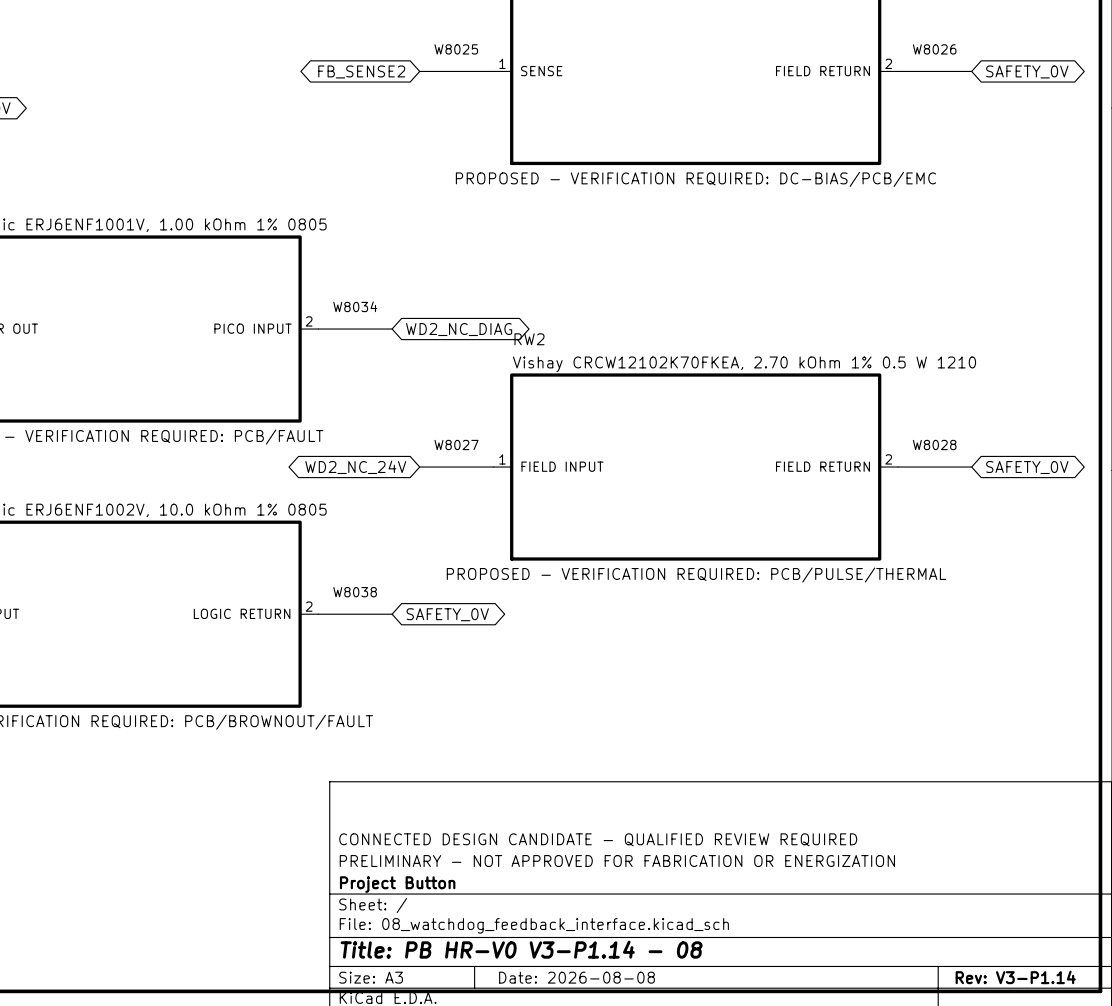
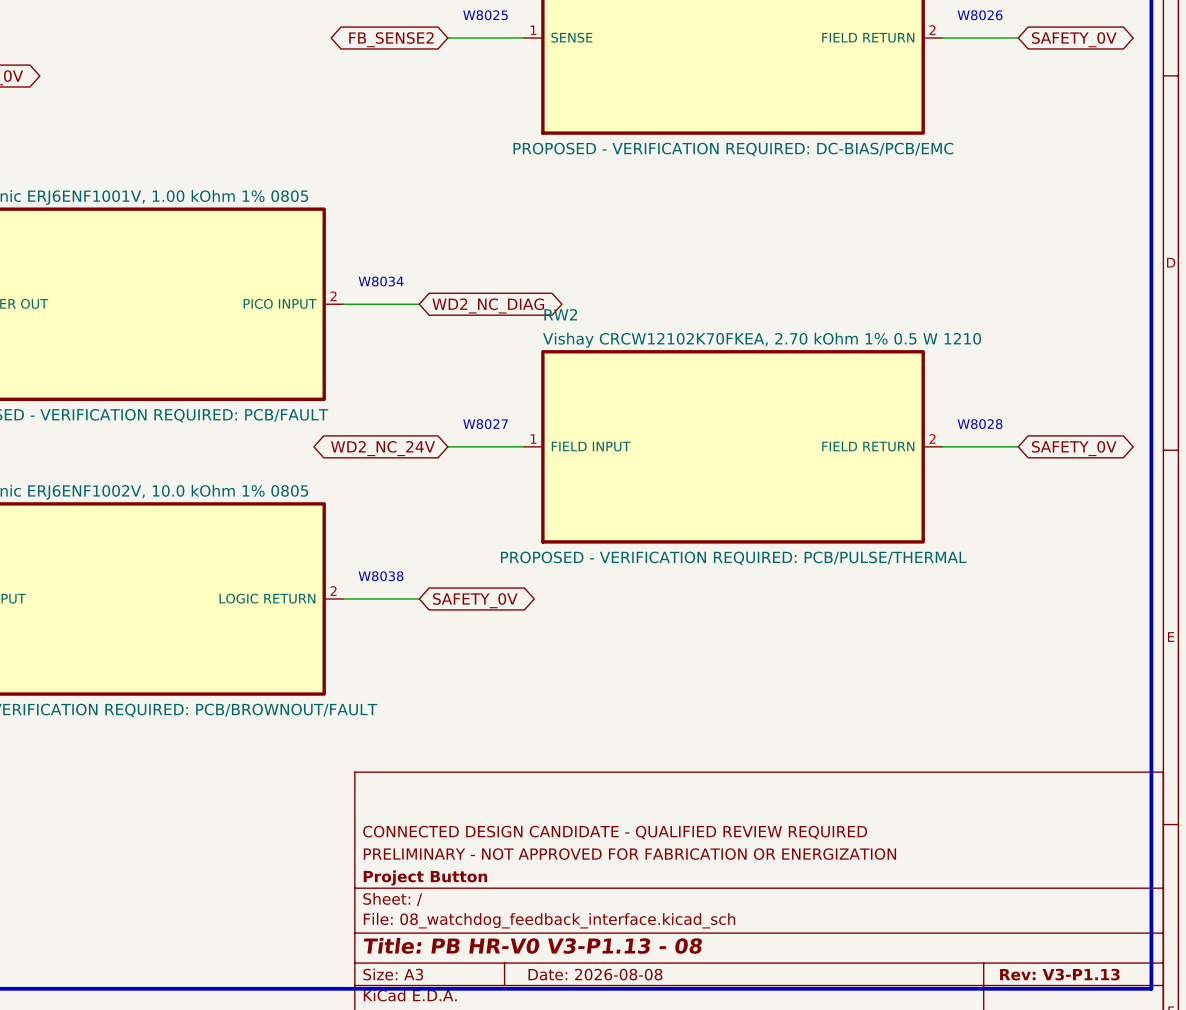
title block: Title: PB HR-V0 V3-P1.14 - 08 (521, 949) -> Title: PB HR-V0 V3-P1.13 - 08 (533, 945)
title block: Rev: V3-P1.14 (1015, 977) -> Rev: V3-P1.13 (1059, 974)

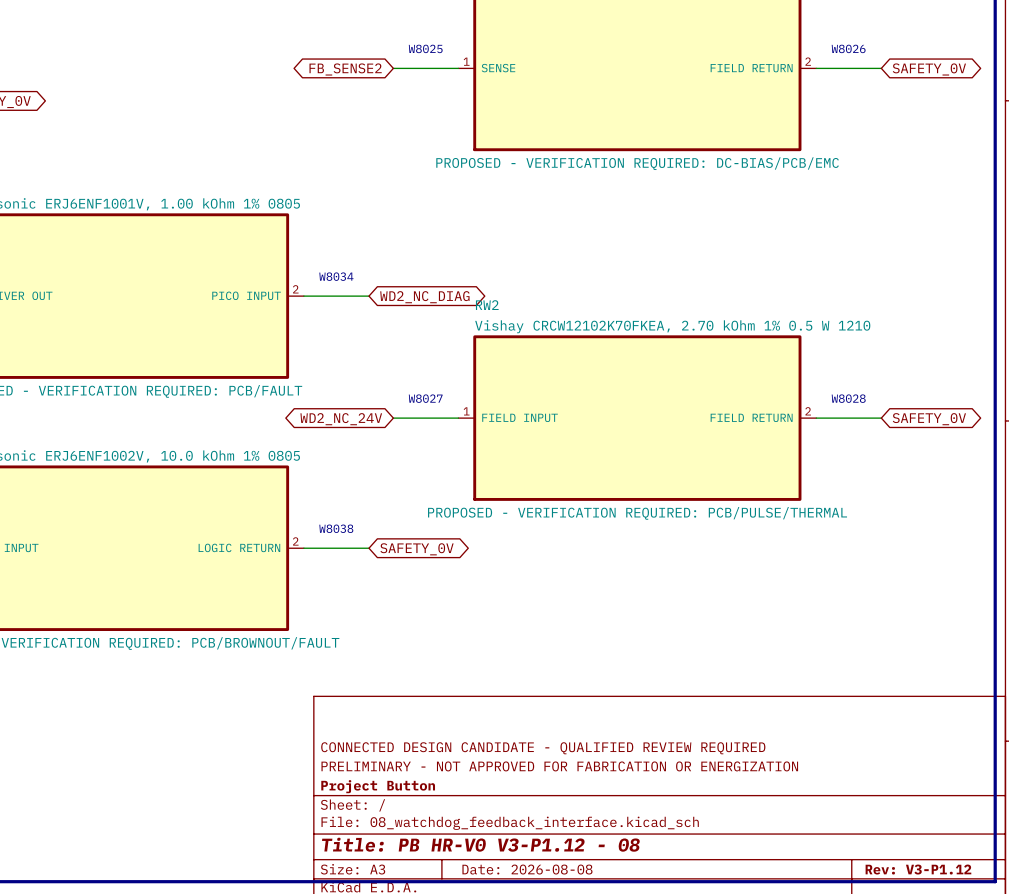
title block: Title: PB HR-V0 V3-P1.13 - 08 (533, 945) -> Title: PB HR-V0 V3-P1.12 - 08 (480, 844)
title block: Rev: V3-P1.13 (1059, 974) -> Rev: V3-P1.12 (918, 869)

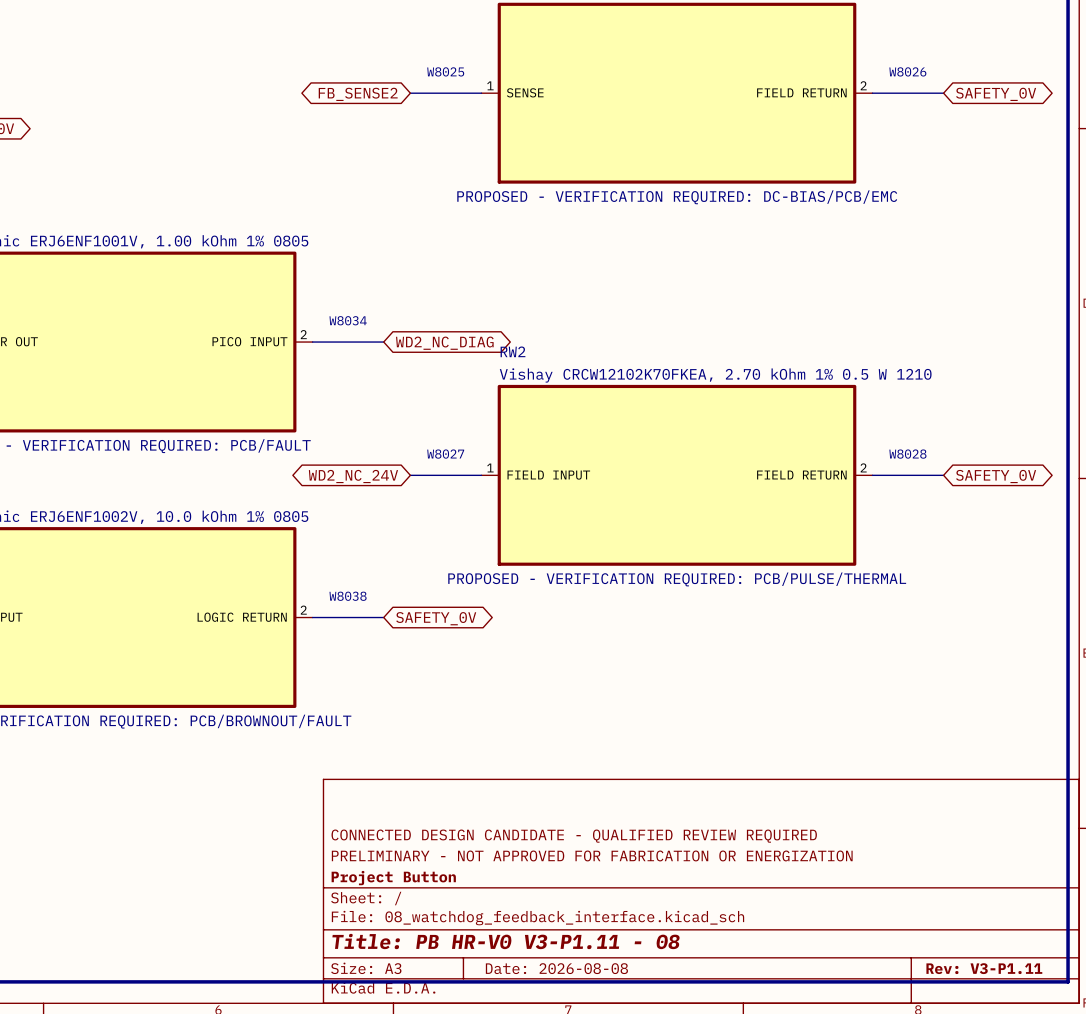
title block: Title: PB HR-V0 V3-P1.12 - 08 (480, 844) -> Title: PB HR-V0 V3-P1.11 - 08 (506, 941)
title block: Rev: V3-P1.12 (918, 869) -> Rev: V3-P1.11 (984, 968)

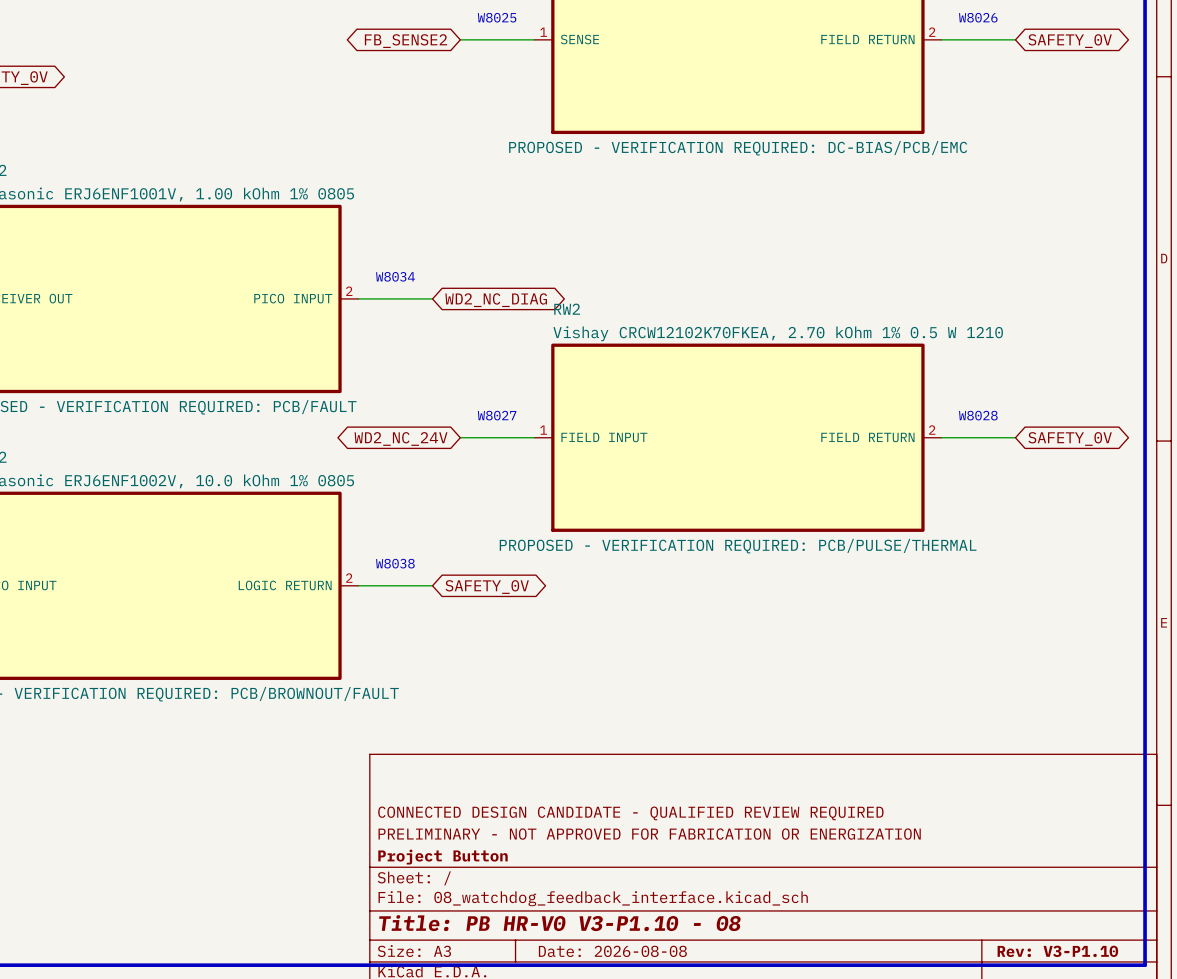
title block: Title: PB HR-V0 V3-P1.11 - 08 (506, 941) -> Title: PB HR-V0 V3-P1.10 - 08 (559, 923)
title block: Rev: V3-P1.11 (984, 968) -> Rev: V3-P1.10 (1057, 951)

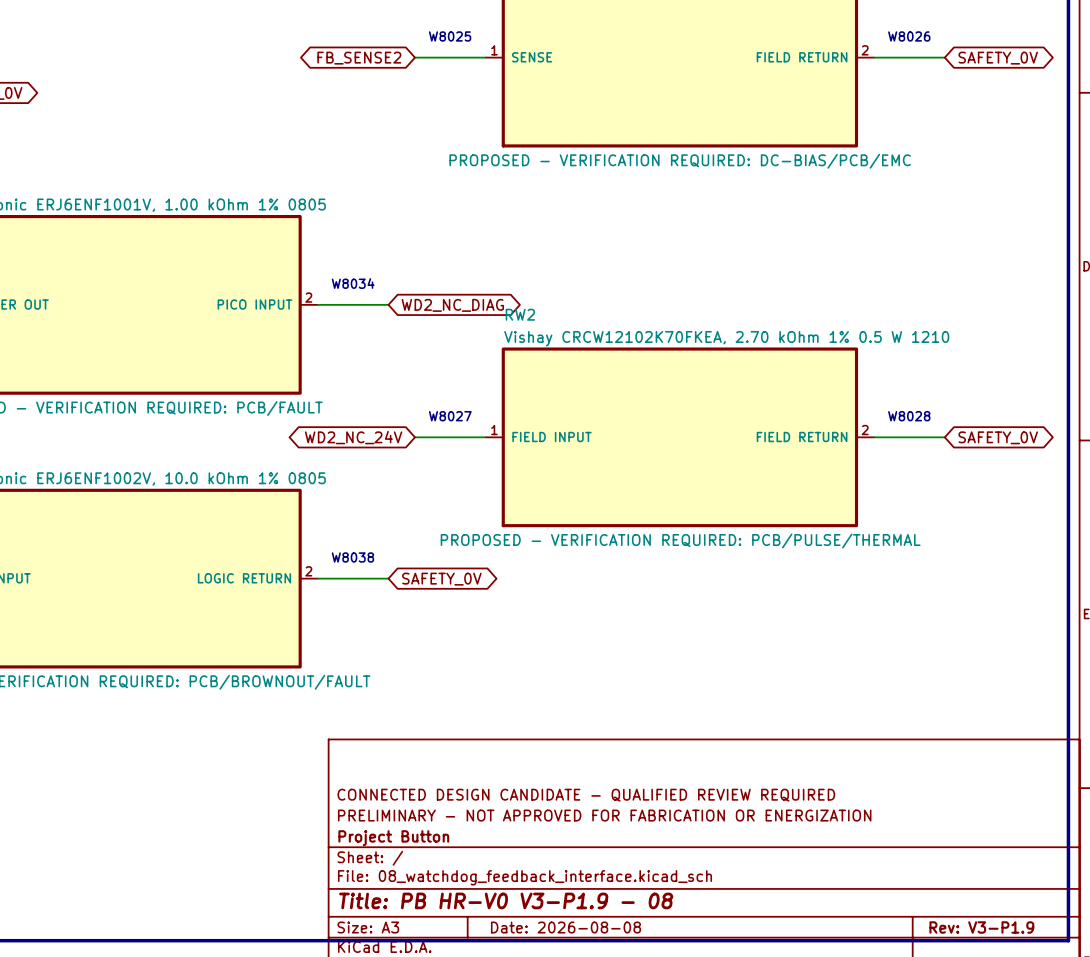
title block: Title: PB HR-V0 V3-P1.10 - 08 (559, 923) -> Title: PB HR-V0 V3-P1.9 - 08 (506, 900)
title block: Rev: V3-P1.10 (1057, 951) -> Rev: V3-P1.9 (981, 927)

